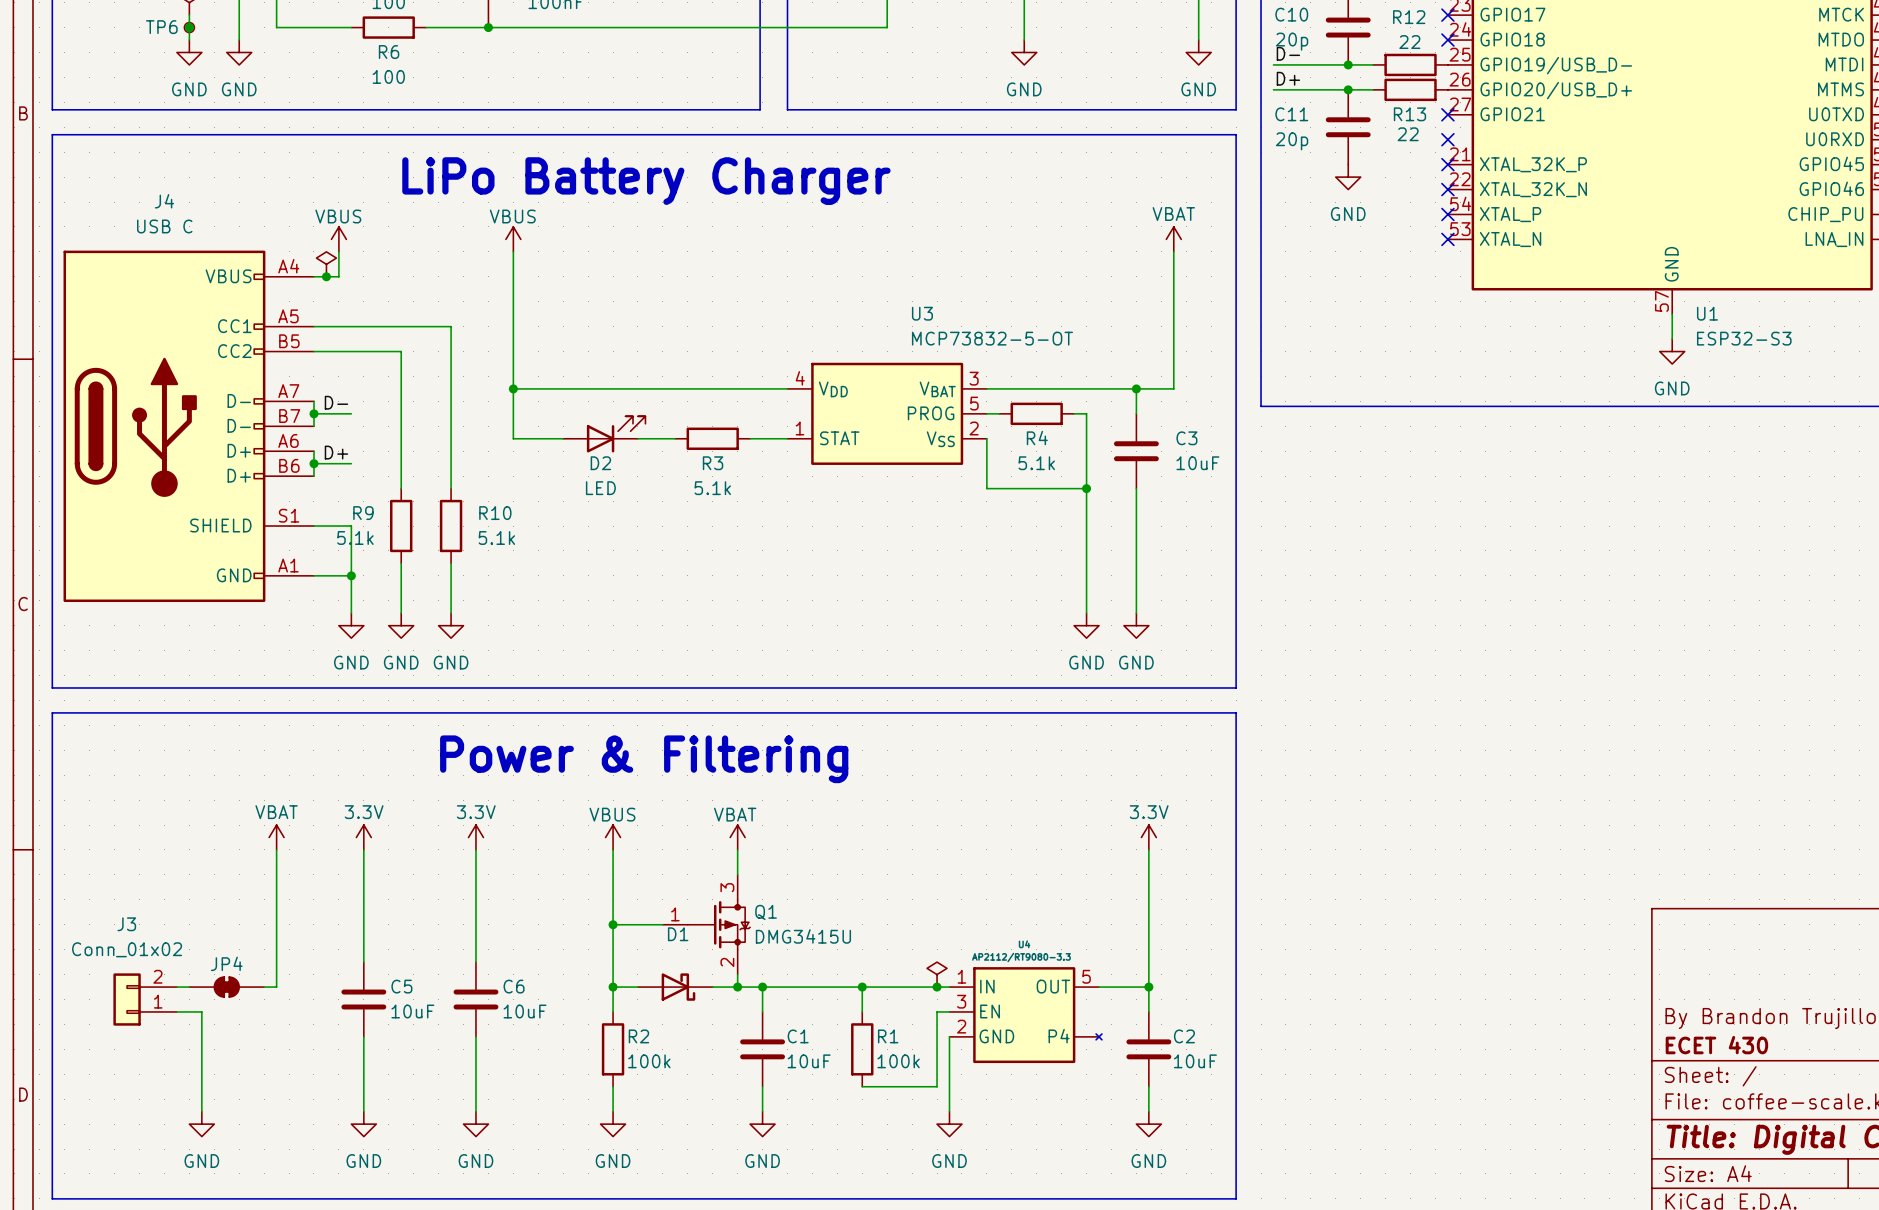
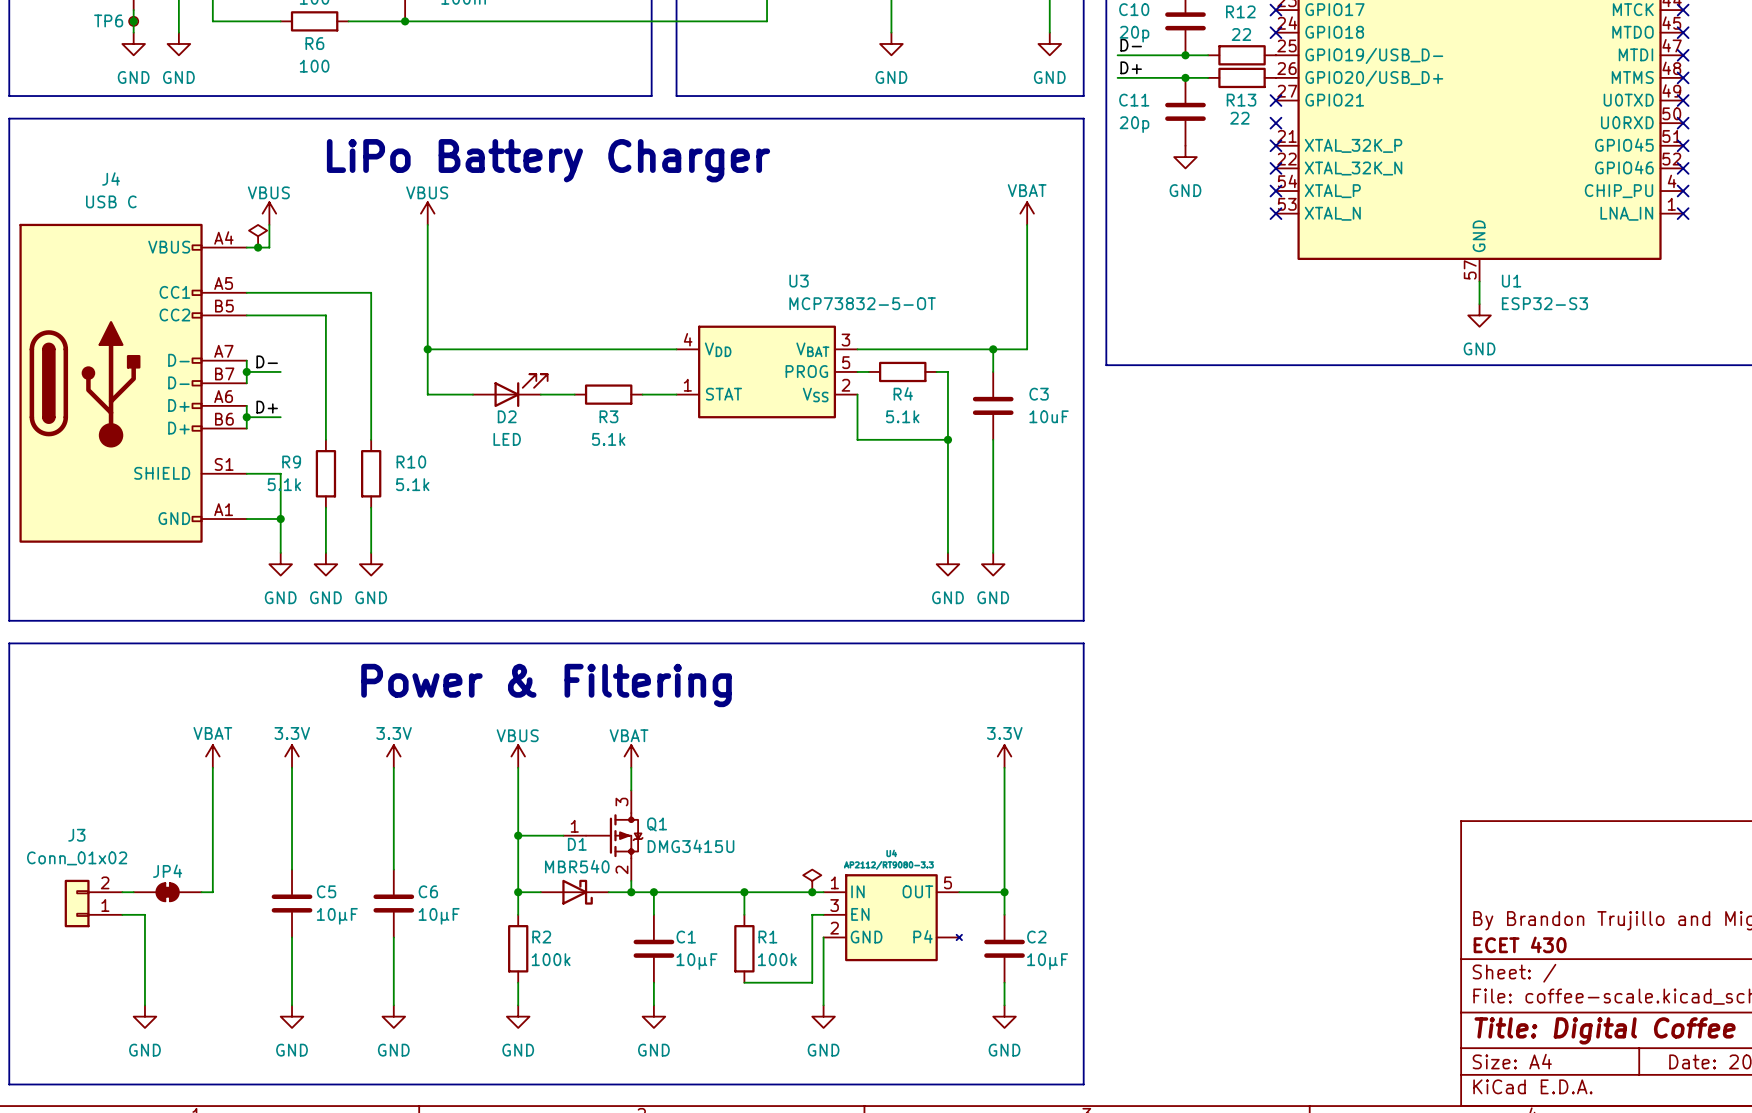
D1 value: none -> MBR540 (577, 866)
C5 value: 10uF (412, 1011) -> 10μF (337, 916)
C6 value: 10uF (525, 1011) -> 10μF (439, 916)
C1 value: 10uF (809, 1061) -> 10μF (696, 961)
C2 value: 10uF (1195, 1061) -> 10μF (1047, 961)

